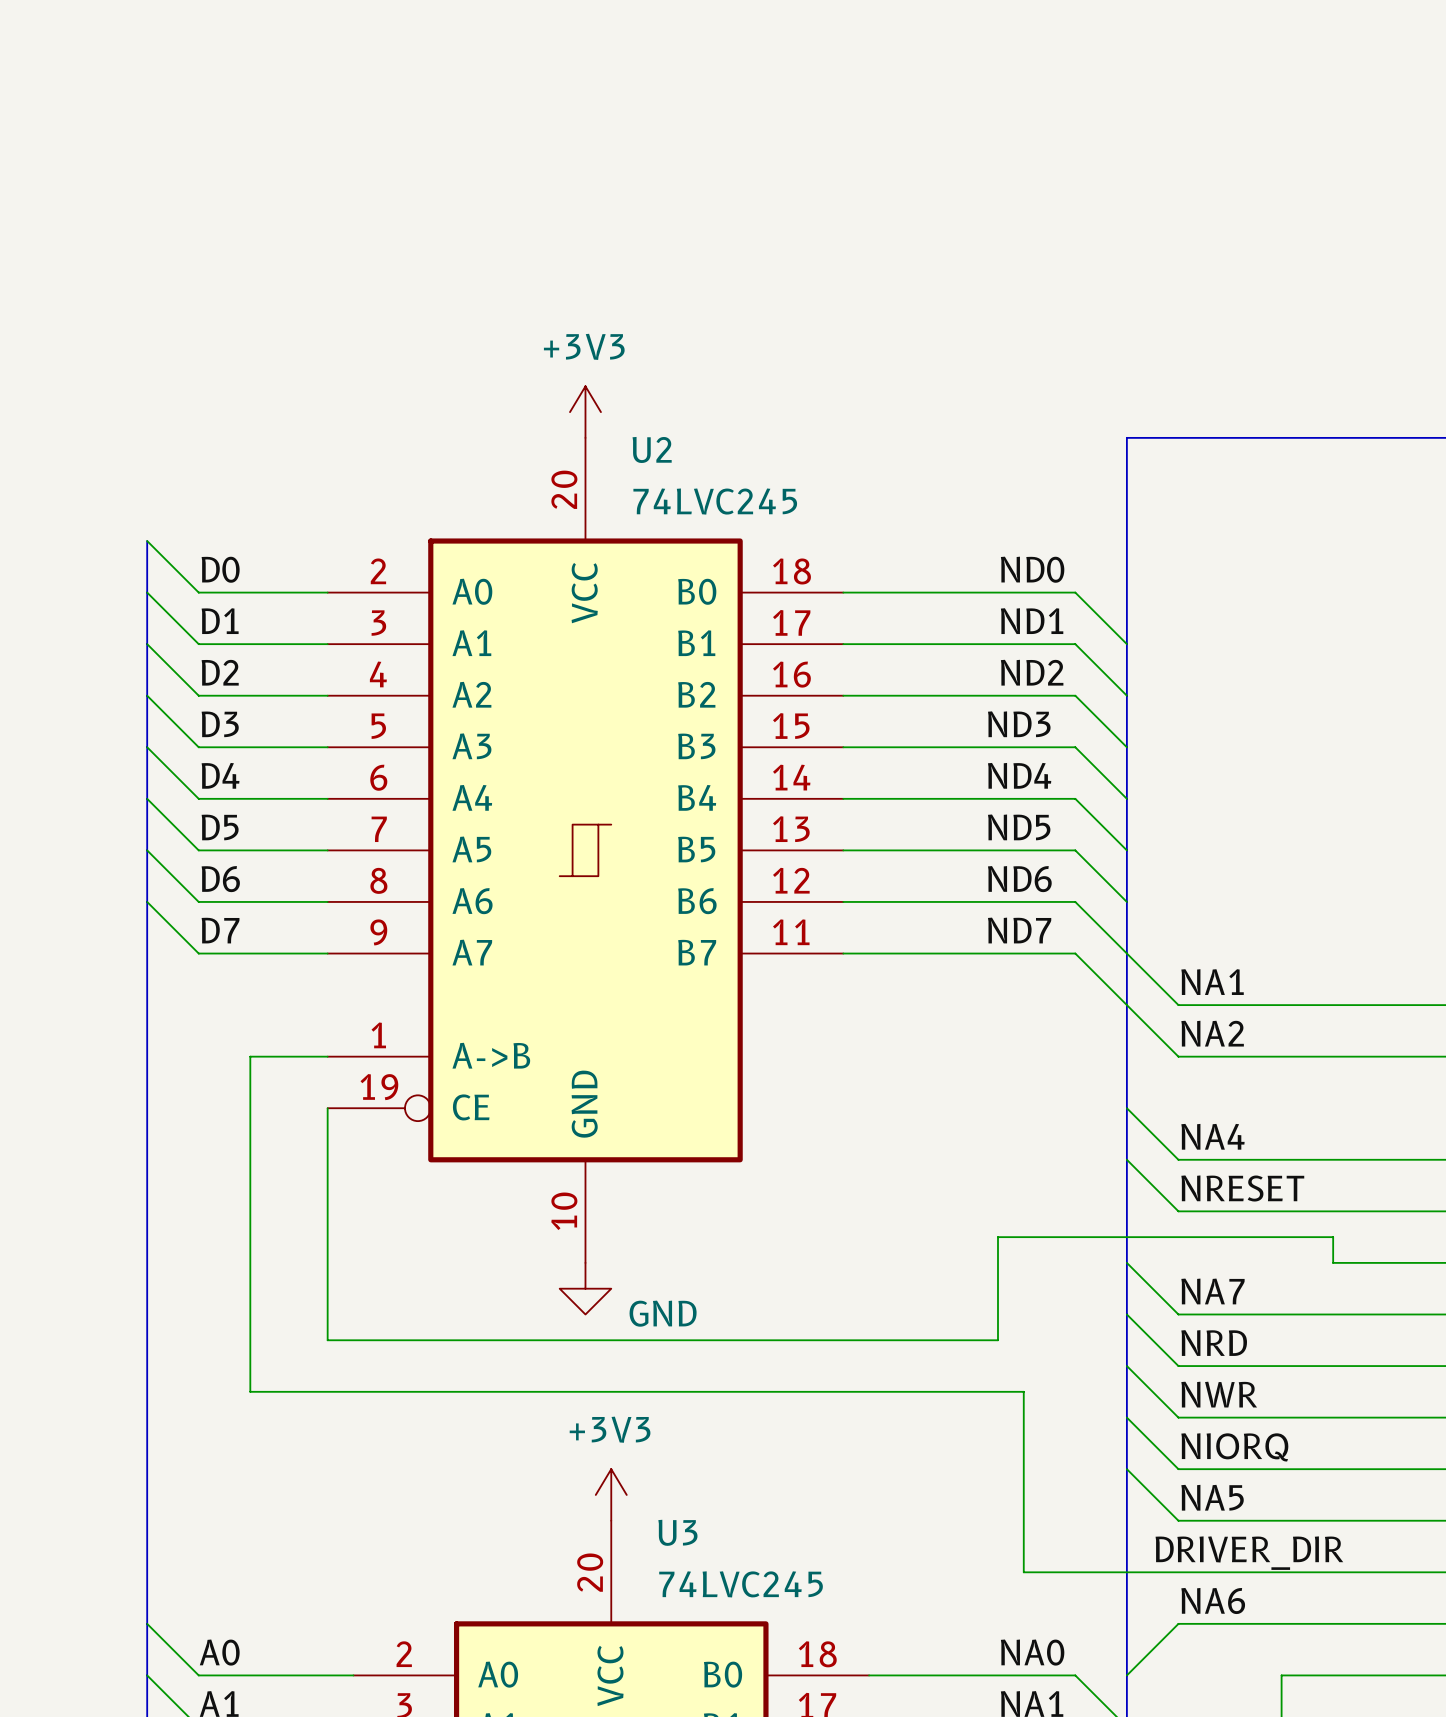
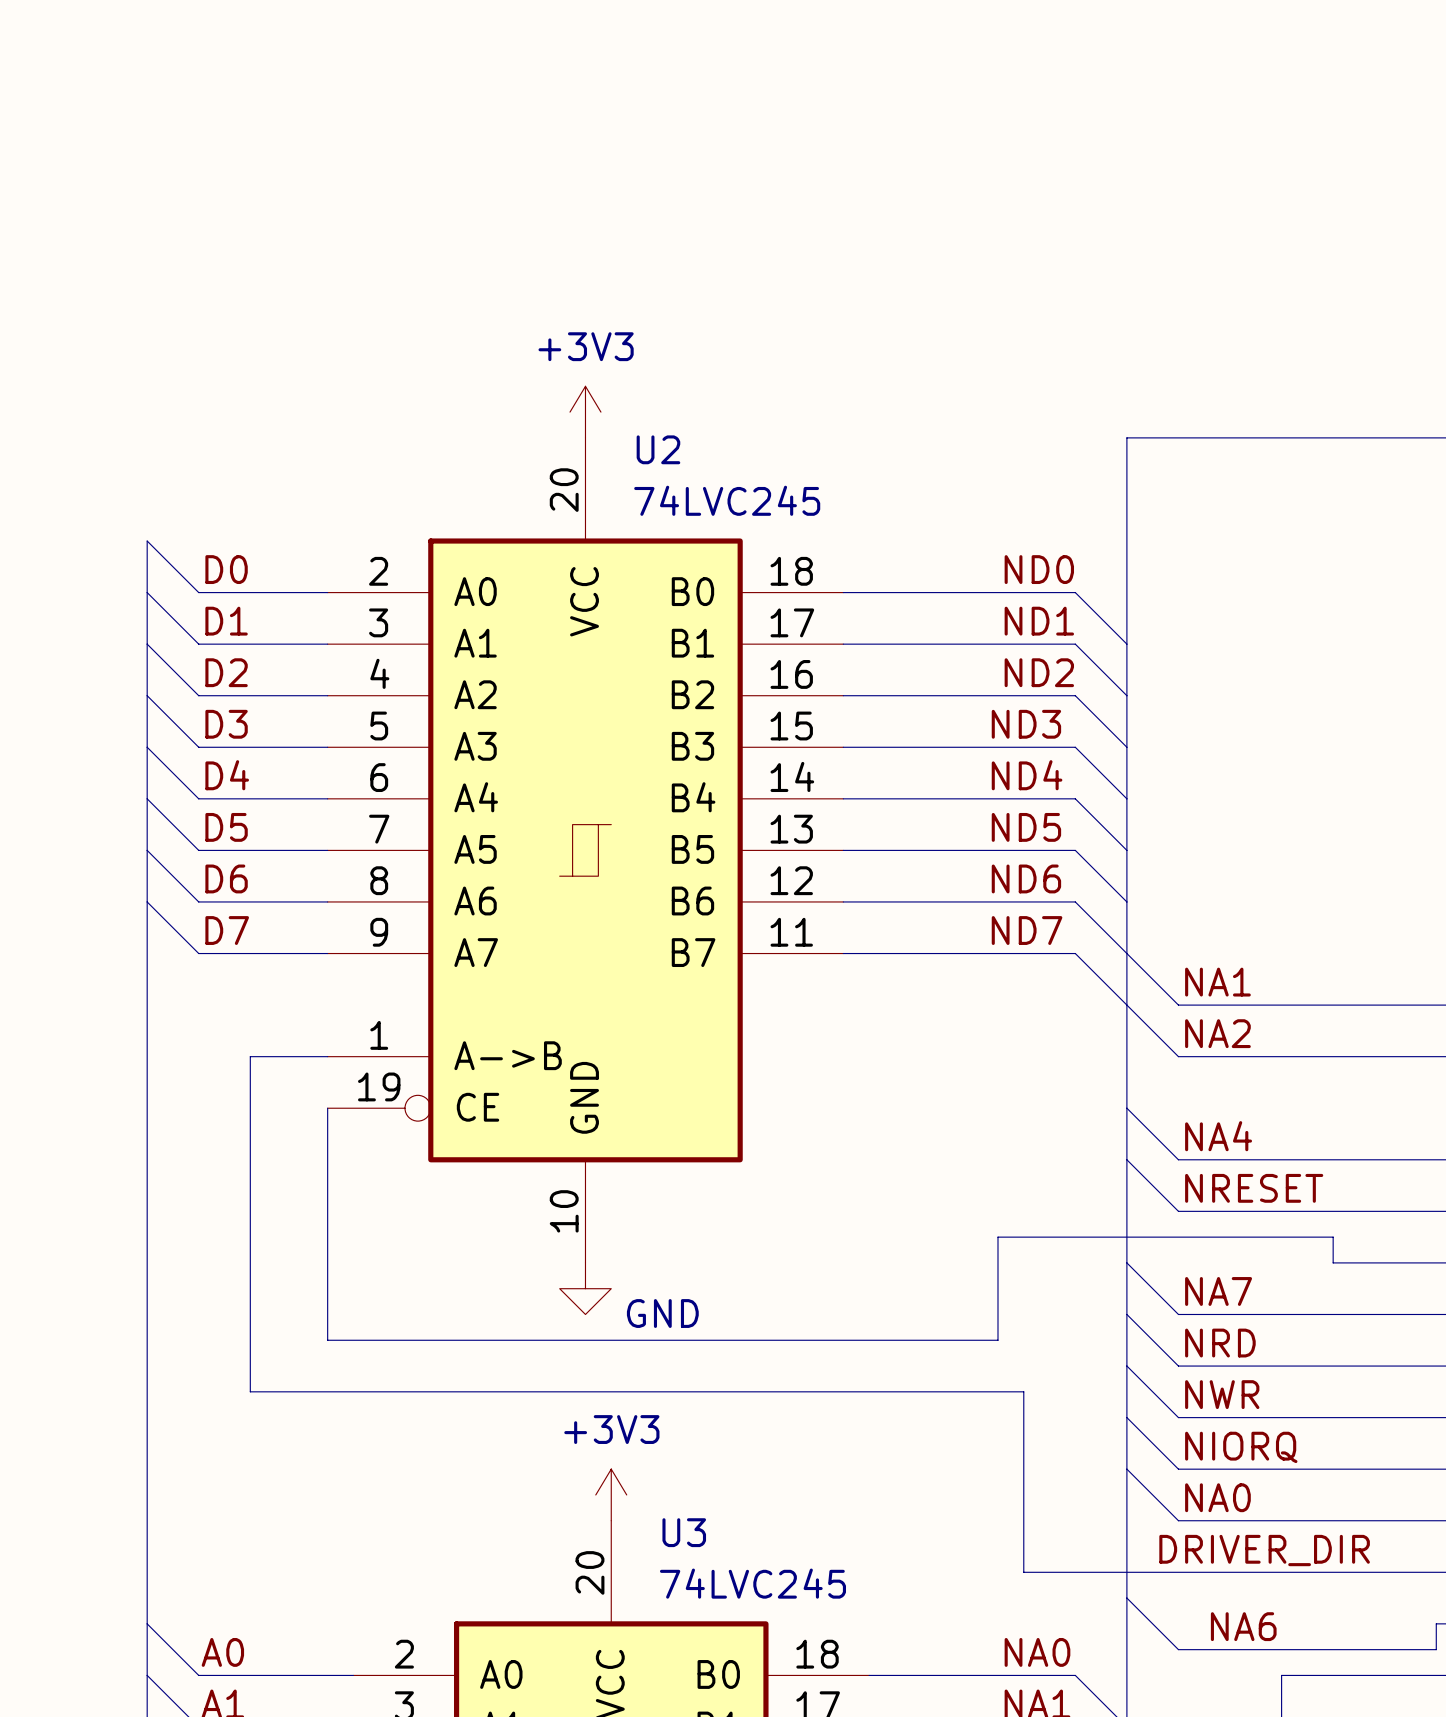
label: NA5 (1212, 1497) -> NA0 (1217, 1497)
label position: NA6 (1213, 1601) -> NA6 (1243, 1626)
wire: (1436, 1623) (1178, 1623) (1126, 1675) -> (1436, 1623) (1436, 1649) (1178, 1649) (1126, 1598)

